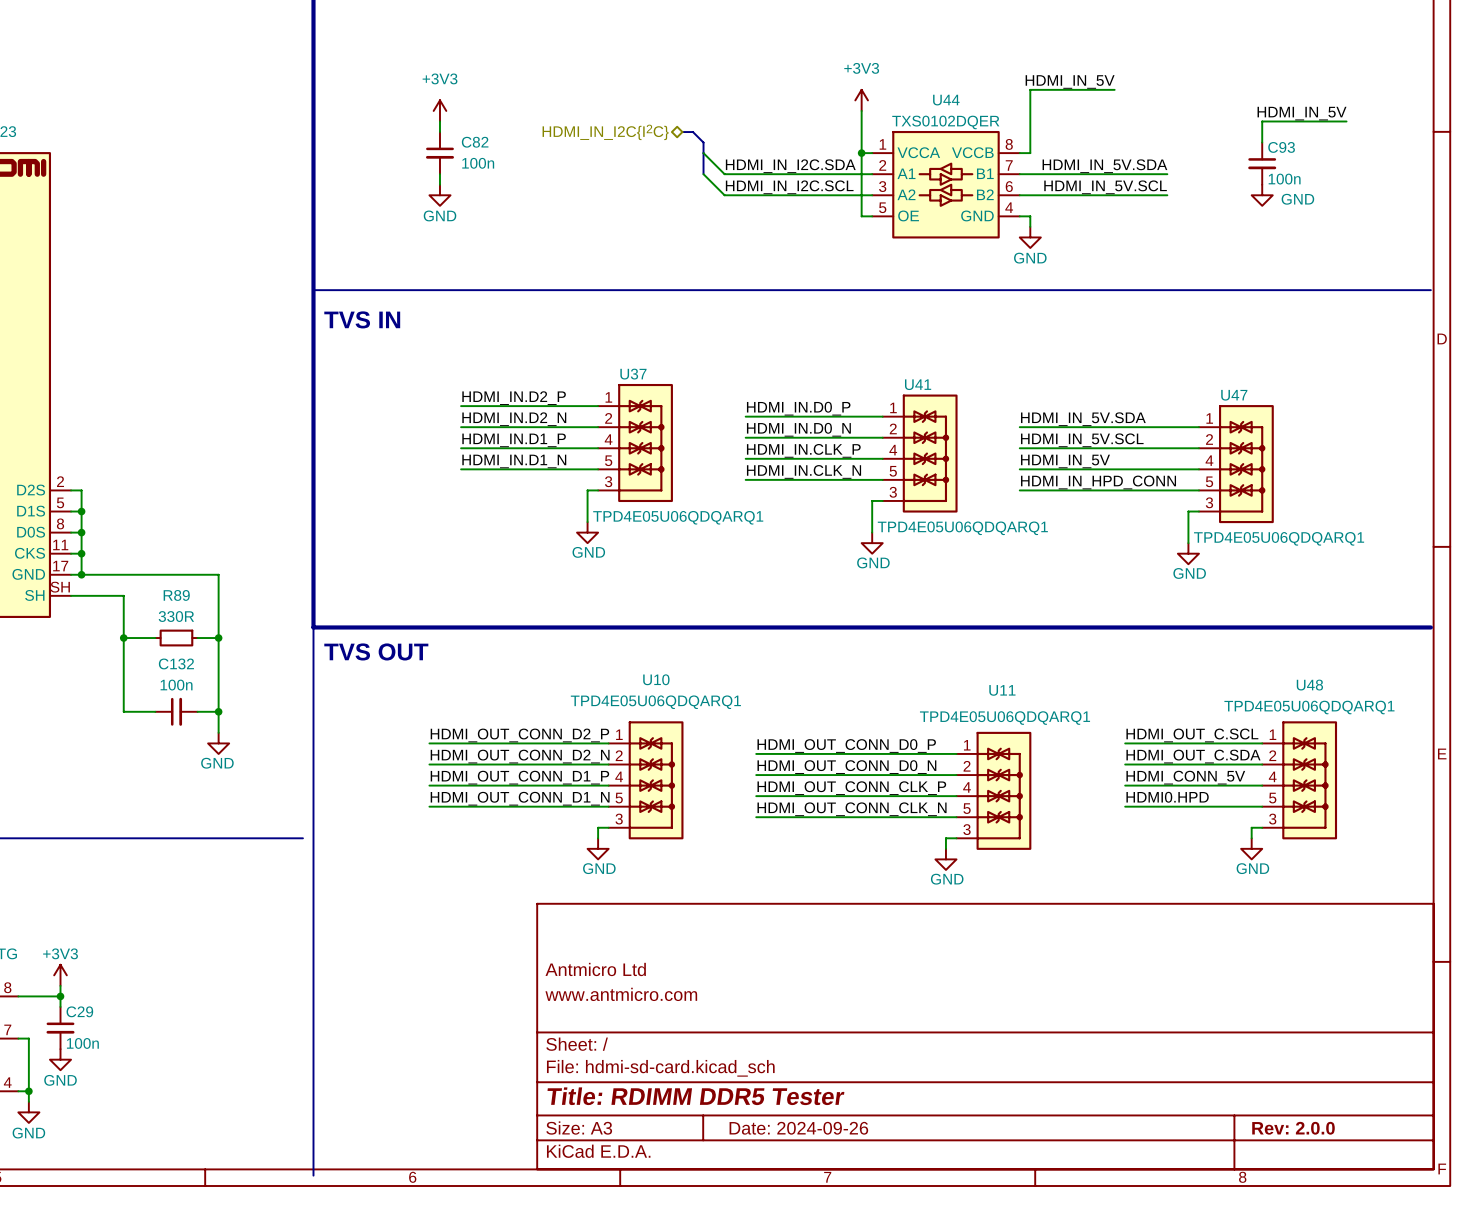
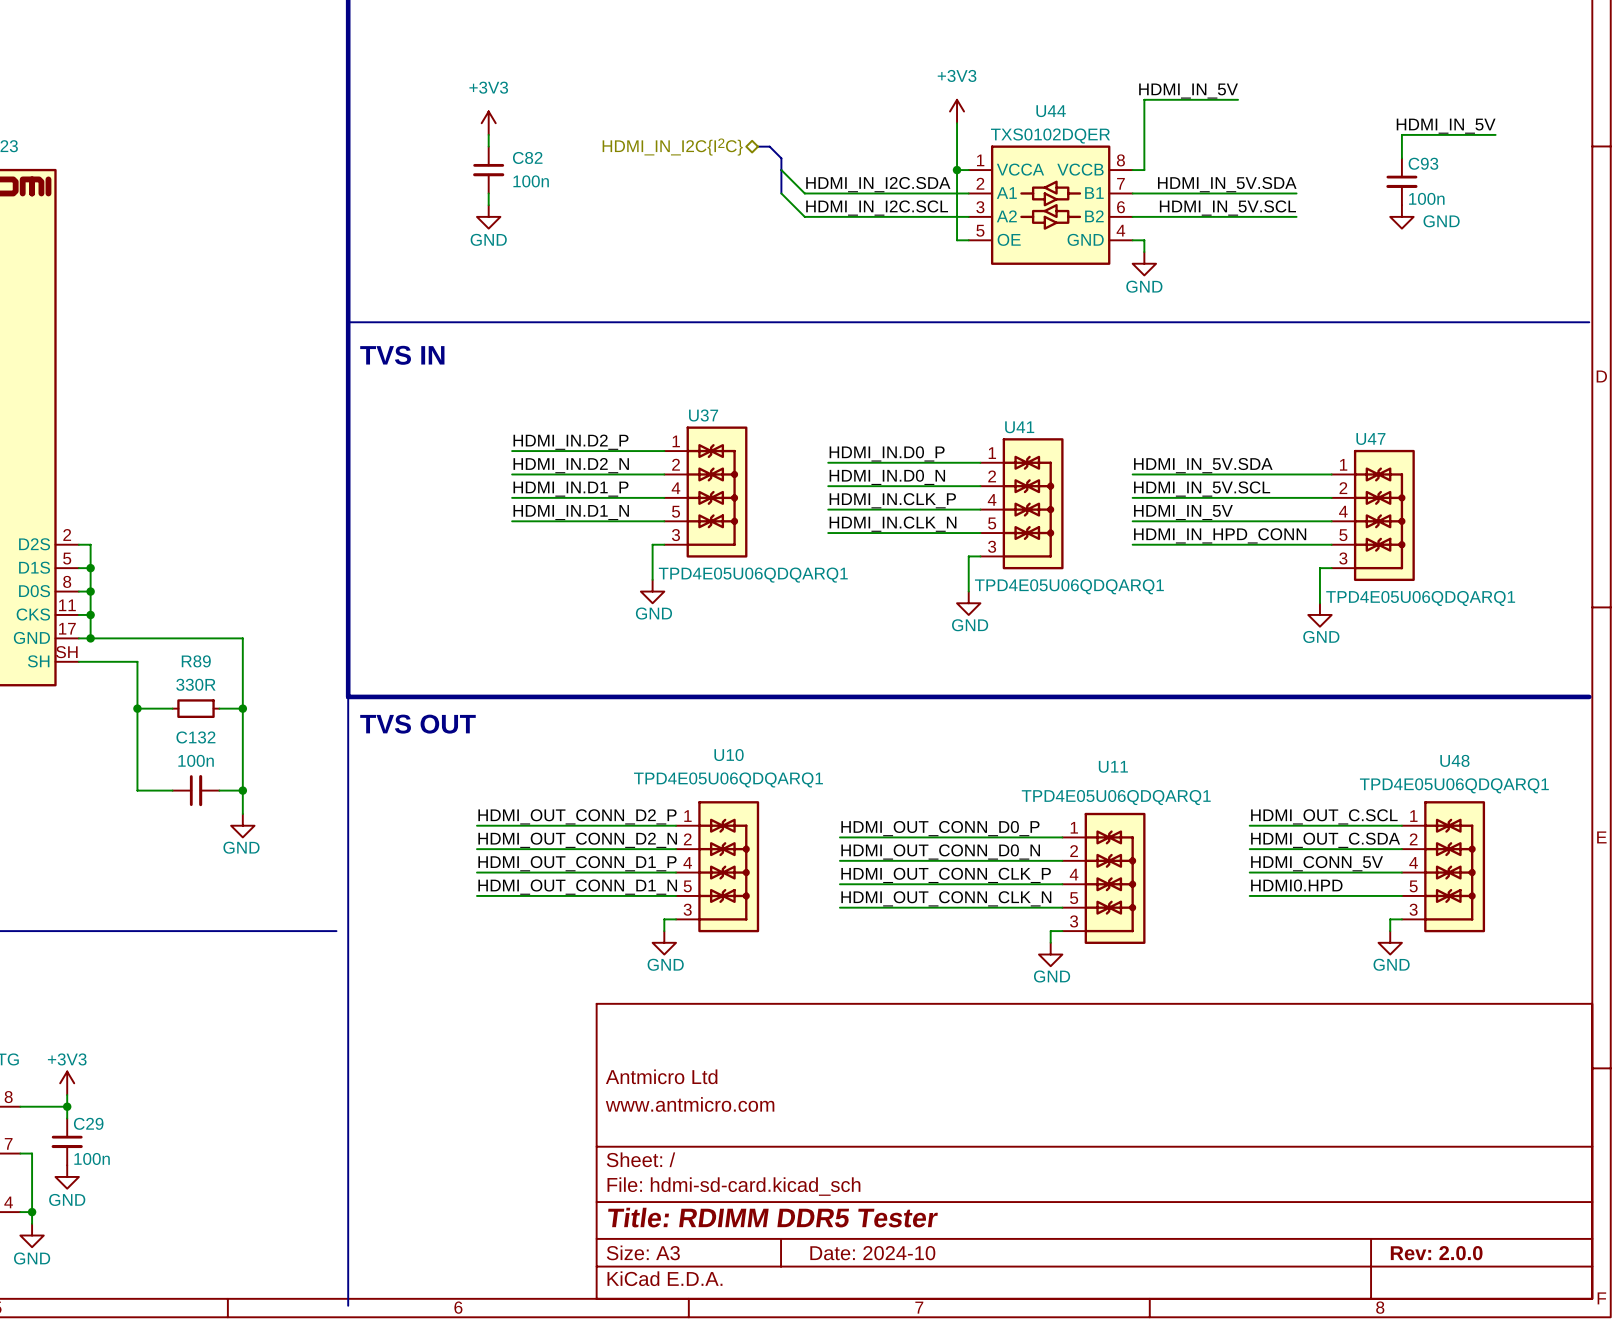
title block: Date: 2024-09-26 (798, 1128) -> Date: 2024-10 (872, 1253)

